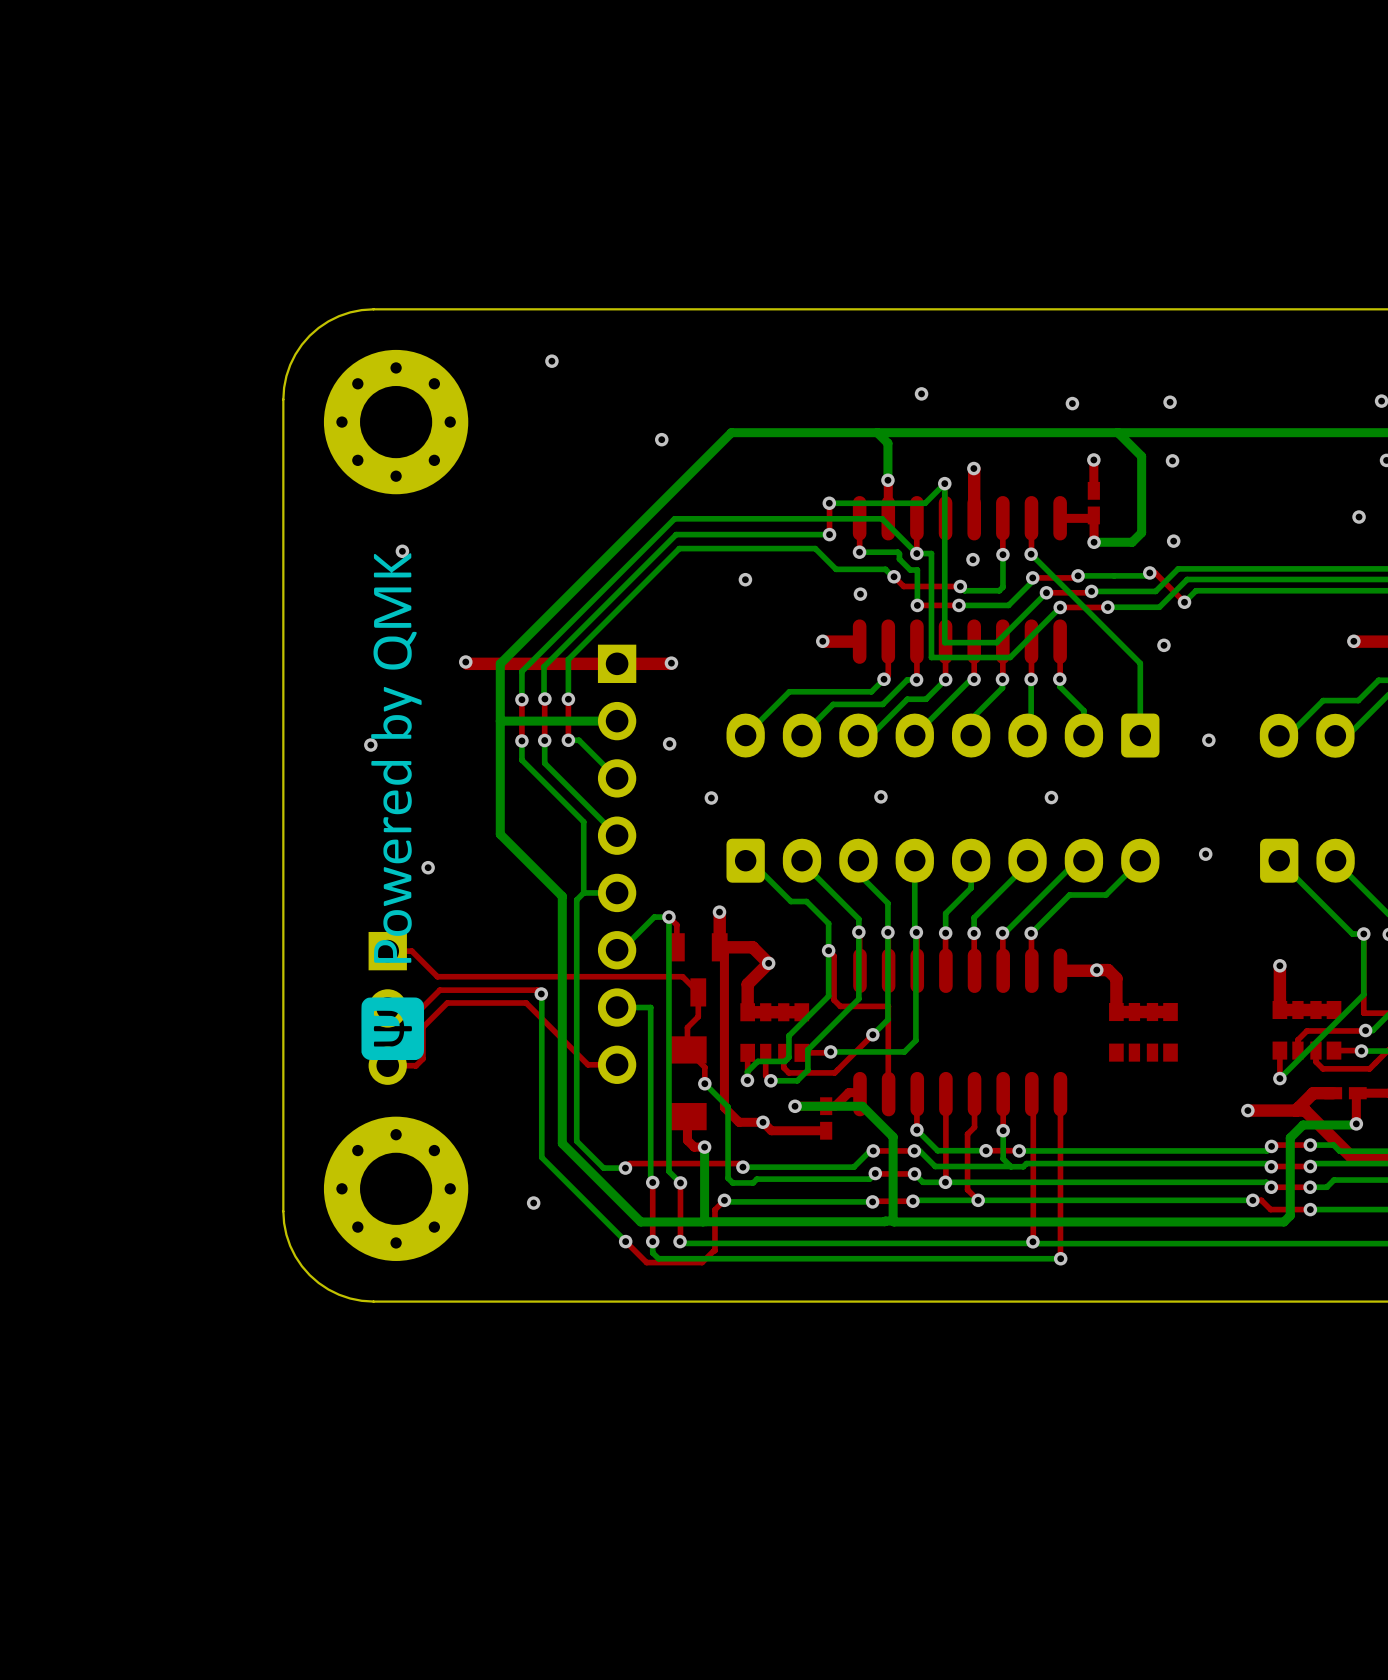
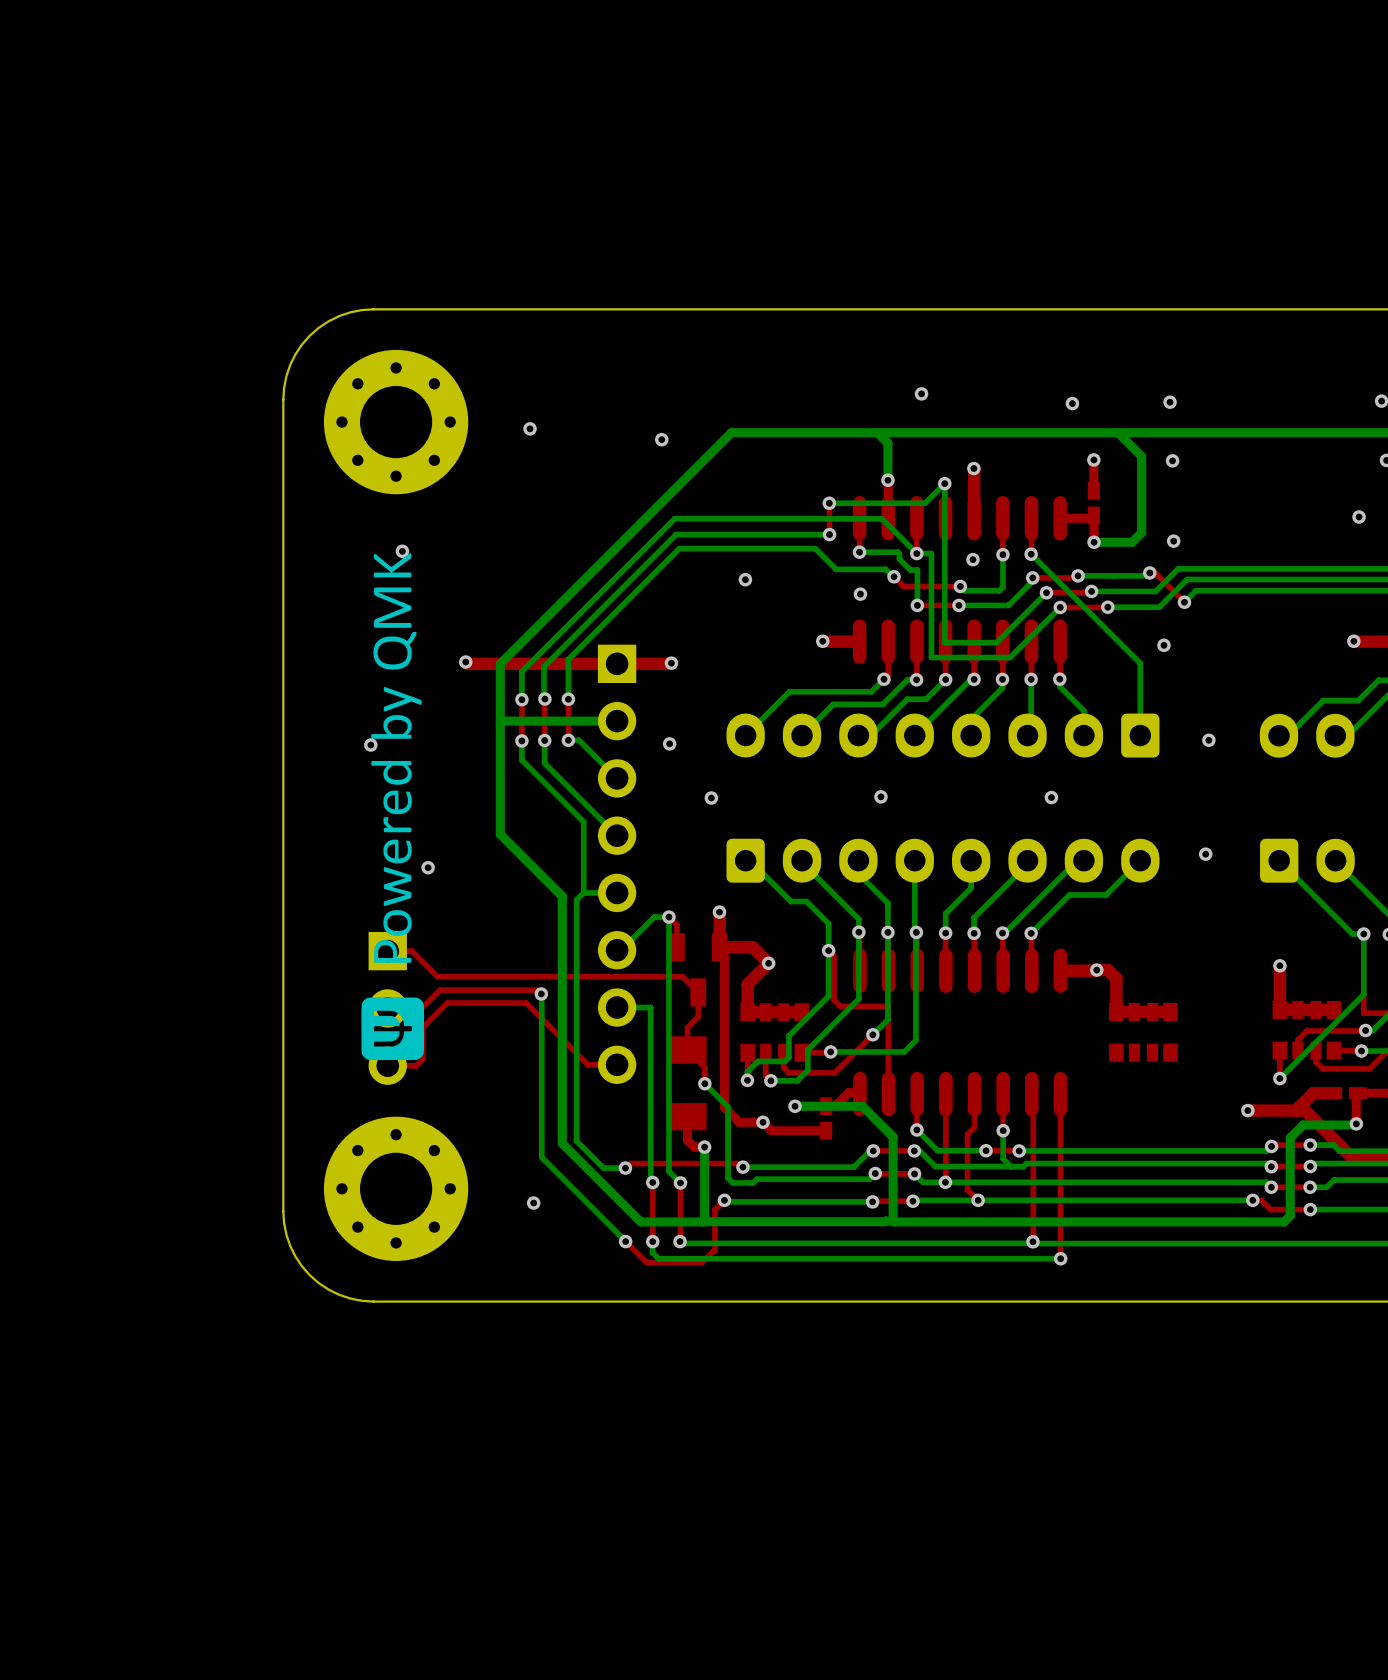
via position: (551, 361) -> (530, 428)

